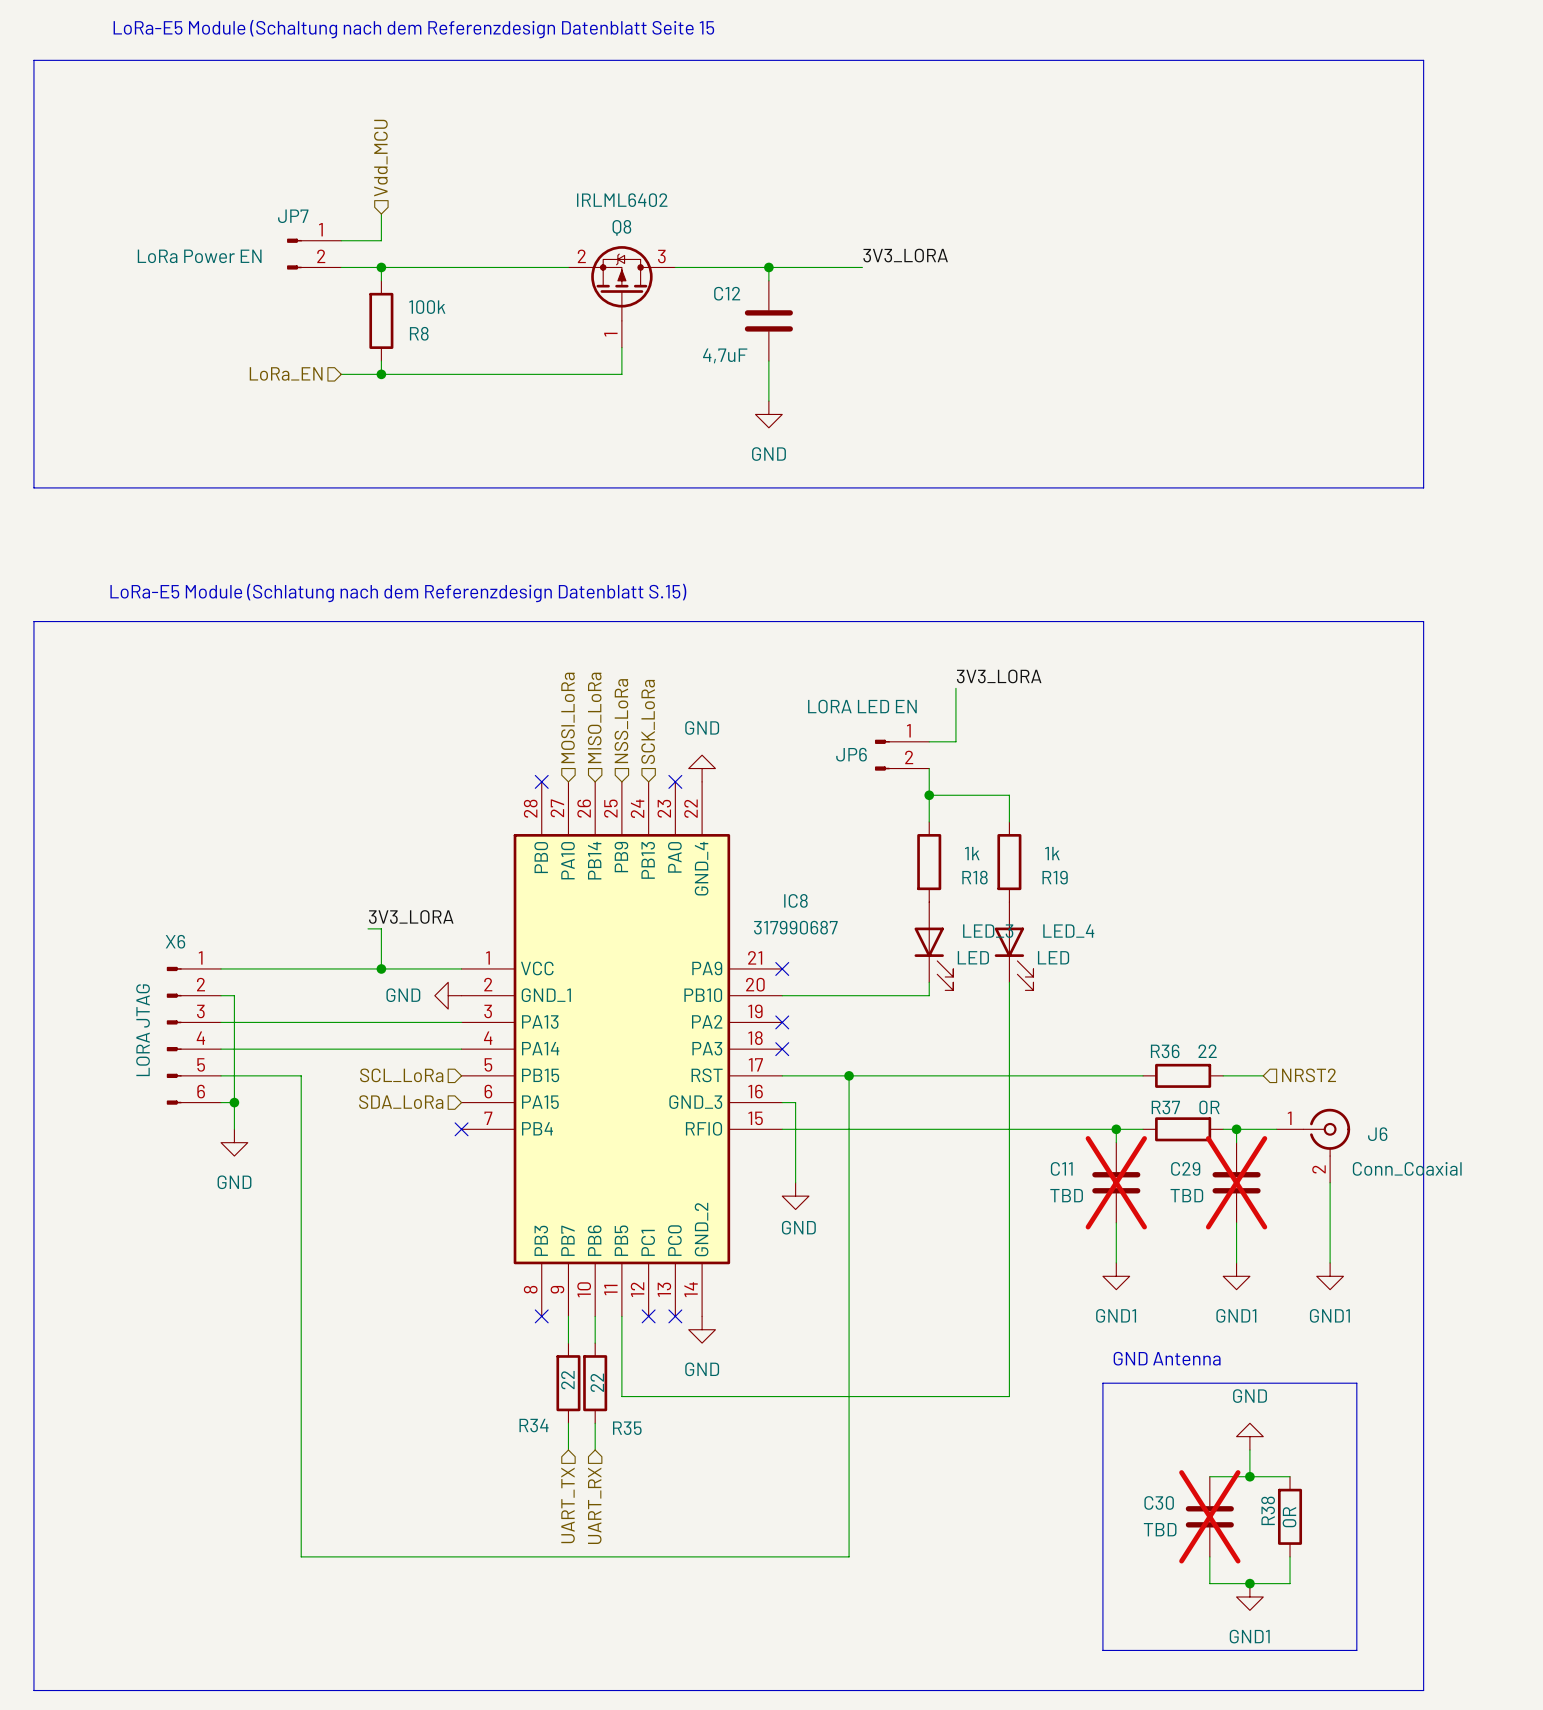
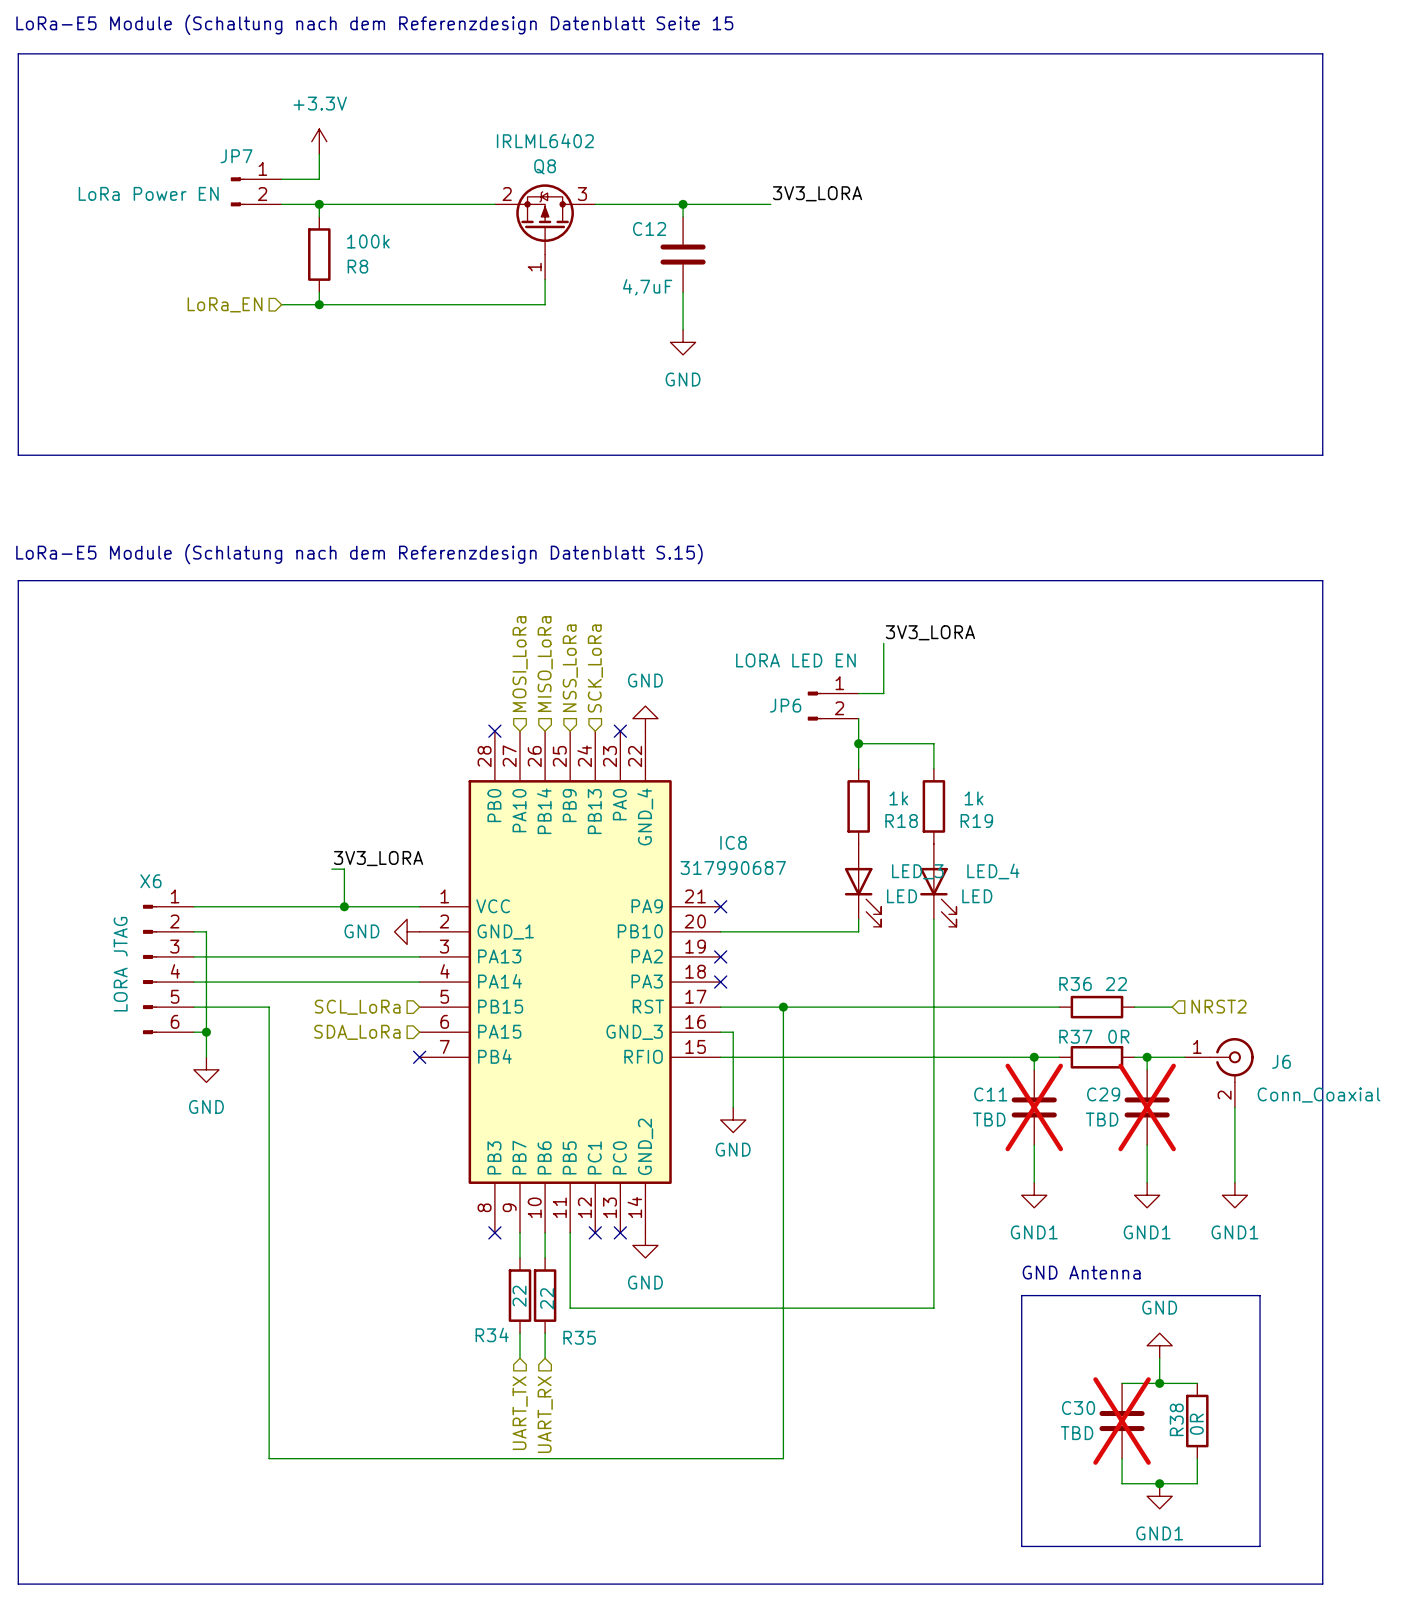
power symbol: none -> +3.3V (319, 141)
hierarchical label: Vdd_MCU (380, 158) -> none
wire: (381, 214) (381, 240) (341, 240) -> (319, 154) (319, 179) (281, 179)
junction: none -> (319, 204)
JP7 position: (314, 254) -> (256, 191)
label position: 3V3_LORA (905, 255) -> 3V3_LORA (817, 193)
wire: (341, 267) (568, 267) -> (281, 204) (494, 204)
wire: (381, 267) (381, 280) -> (319, 204) (319, 216)
junction: (381, 267) -> none
wire: (675, 267) (862, 267) -> (595, 204) (770, 204)
wire: (768, 267) (768, 280) -> (683, 204) (683, 216)
junction position: (768, 267) -> (683, 204)
Q8 position: (621, 296) -> (545, 231)
R8 position: (381, 320) -> (319, 254)
C12 position: (768, 320) -> (683, 254)
junction: none -> (319, 304)
wire: (621, 347) (621, 374) (341, 374) -> (545, 279) (545, 304) (281, 304)
wire: (381, 361) (381, 374) -> (319, 292) (319, 304)
wire: (768, 361) (768, 401) -> (683, 292) (683, 329)
hierarchical label position: LoRa_EN (286, 373) -> LoRa_EN (225, 304)
junction: (381, 374) -> none
power symbol position: GND (768, 414) -> GND (683, 342)

